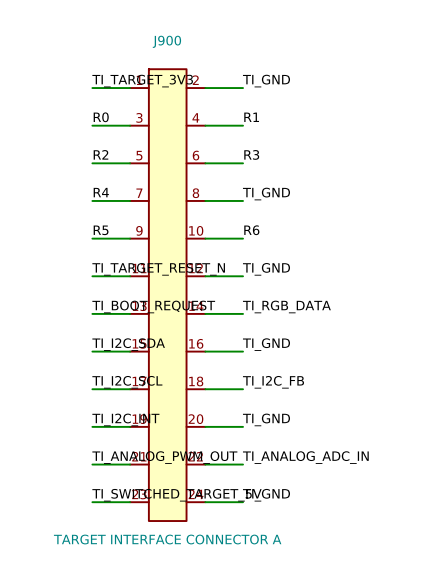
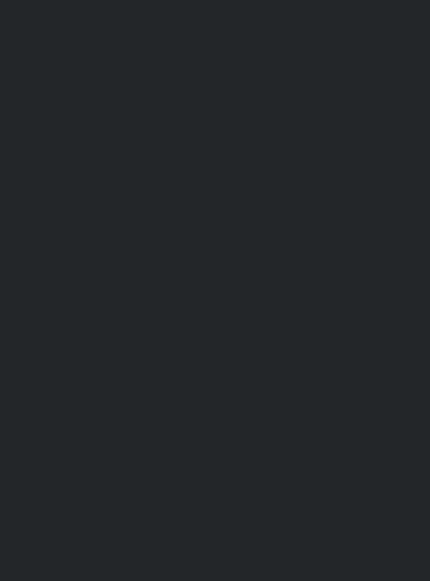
label: TI_TARGET_3V3 (142, 81) -> none
label: TI_GND (266, 81) -> none
wire: (92, 88) (130, 88) -> none
wire: (205, 88) (243, 88) -> none
label: R0 (101, 117) -> none
label: R1 (251, 117) -> none
wire: (92, 125) (130, 125) -> none
wire: (205, 125) (243, 125) -> none
label: R2 (100, 154) -> none
label: R3 (251, 154) -> none
wire: (92, 163) (130, 163) -> none
wire: (205, 163) (243, 163) -> none
label: R4 (101, 192) -> none
label: TI_GND (266, 194) -> none
wire: (92, 200) (130, 200) -> none
wire: (205, 200) (243, 200) -> none
label: R5 (101, 230) -> none
label: R6 (251, 230) -> none
wire: (92, 238) (130, 238) -> none
wire: (205, 238) (243, 238) -> none
label: TI_TARGET_RESET_N (158, 269) -> none
label: TI_GND (266, 269) -> none
wire: (92, 276) (130, 276) -> none
wire: (205, 276) (243, 276) -> none
J900: TARGET INTERFACE CONNECTOR A (167, 295) -> none
label: TI_BOOT_REQUEST (153, 306) -> none
label: TI_RGB_DATA (286, 306) -> none
wire: (92, 313) (130, 313) -> none
wire: (205, 313) (243, 313) -> none
label: TI_I2C_SDA (128, 344) -> none
label: TI_GND (266, 344) -> none
wire: (92, 351) (130, 351) -> none
wire: (205, 351) (243, 351) -> none
label: TI_I2C_SCL (127, 382) -> none
label: TI_I2C_FB (273, 382) -> none
wire: (92, 389) (130, 389) -> none
wire: (205, 389) (243, 389) -> none
label: TI_I2C_INT (125, 419) -> none
label: TI_GND (266, 419) -> none
wire: (92, 426) (130, 426) -> none
wire: (205, 426) (243, 426) -> none
label: TI_ANALOG_PWM_OUT (164, 457) -> none
label: TI_ANALOG_ADC_IN (305, 457) -> none
wire: (92, 464) (130, 464) -> none
wire: (205, 464) (243, 464) -> none
label: TI_SWITCHED_TARGET_5V (176, 495) -> none
label: TI_GND (266, 495) -> none
wire: (92, 502) (130, 502) -> none
wire: (205, 502) (243, 502) -> none

